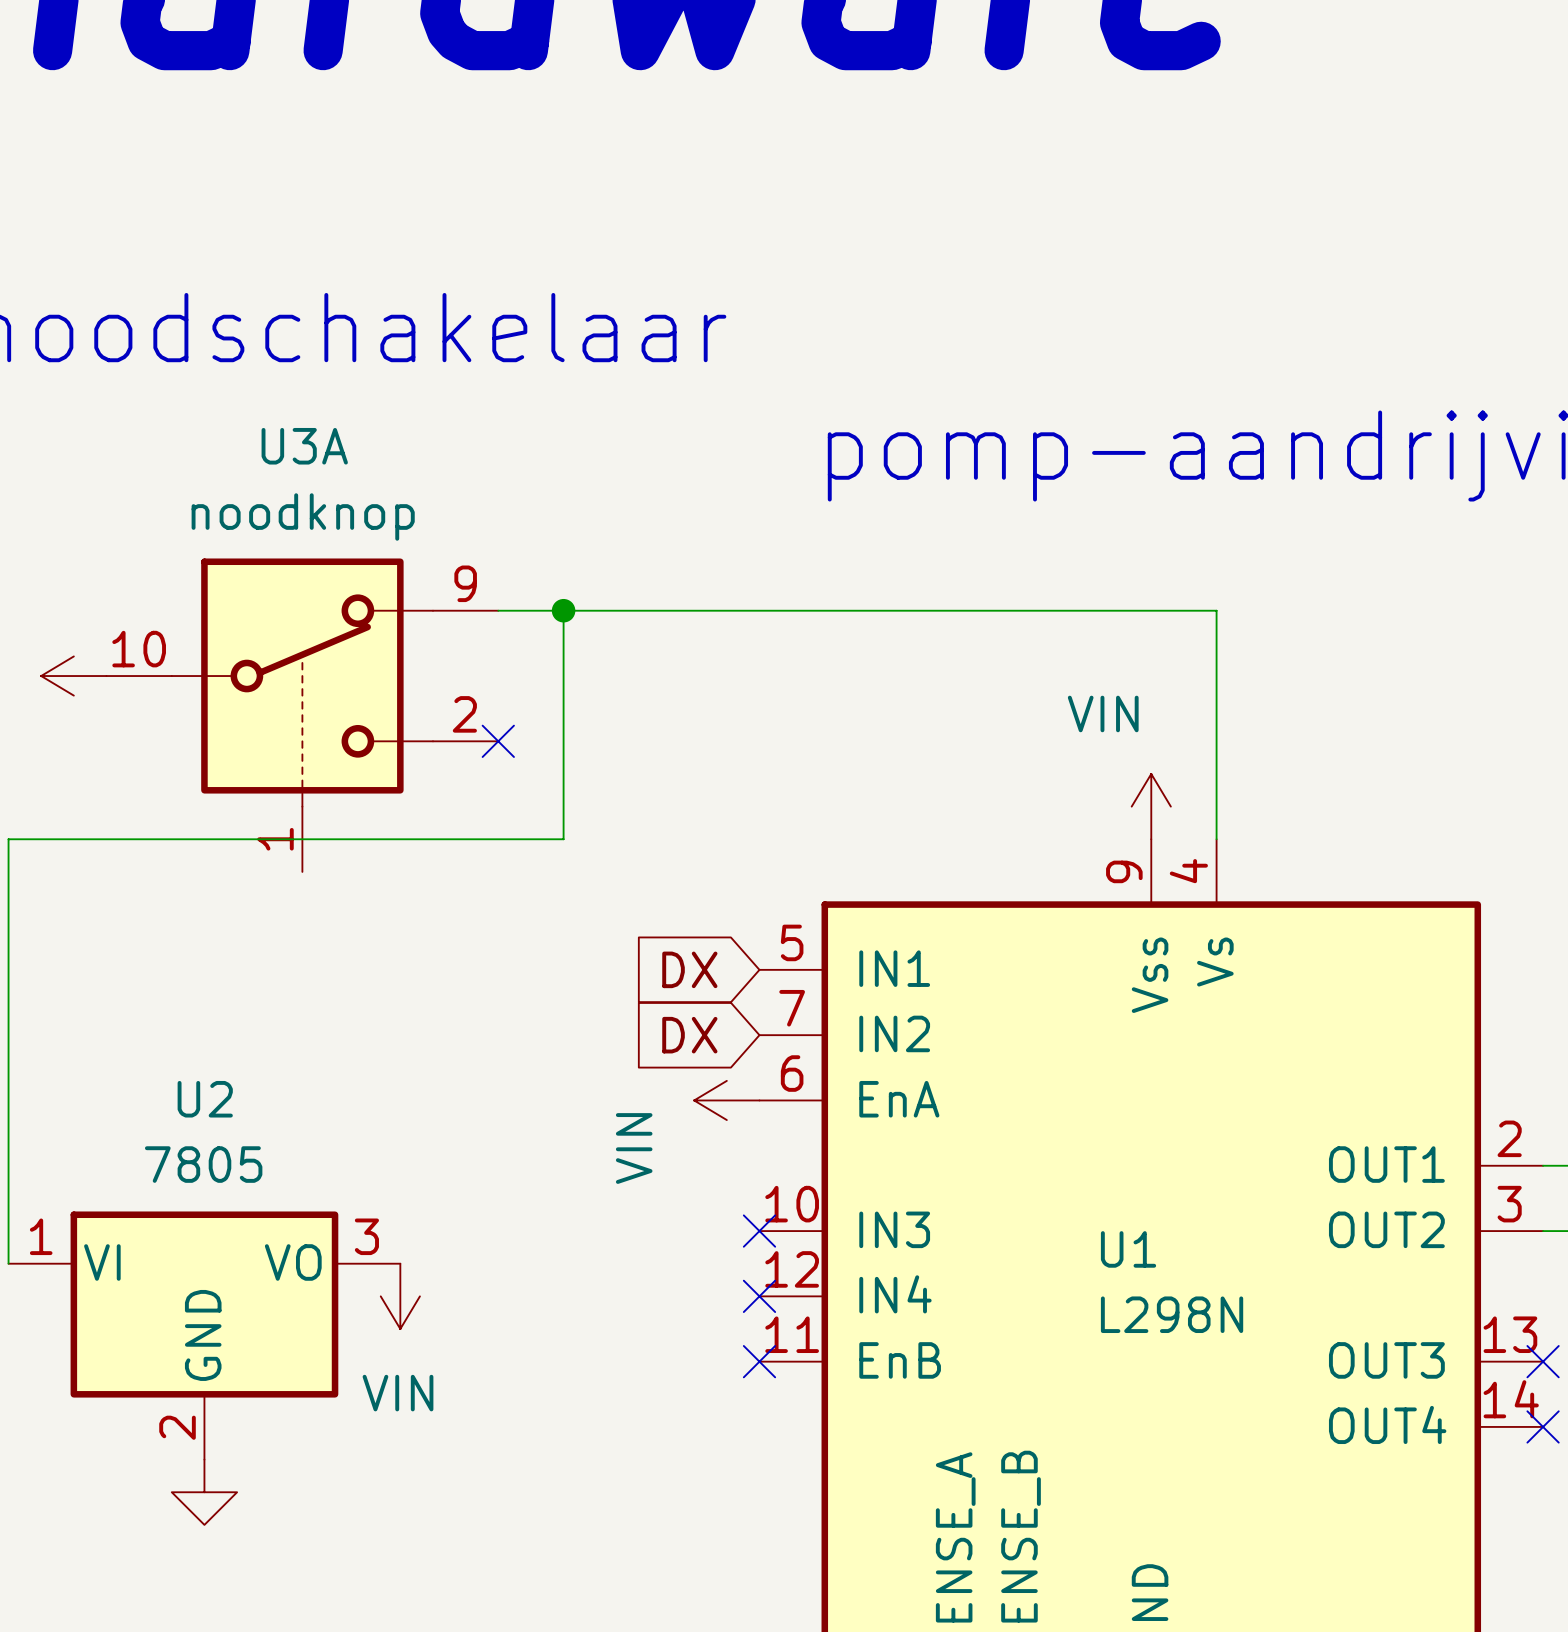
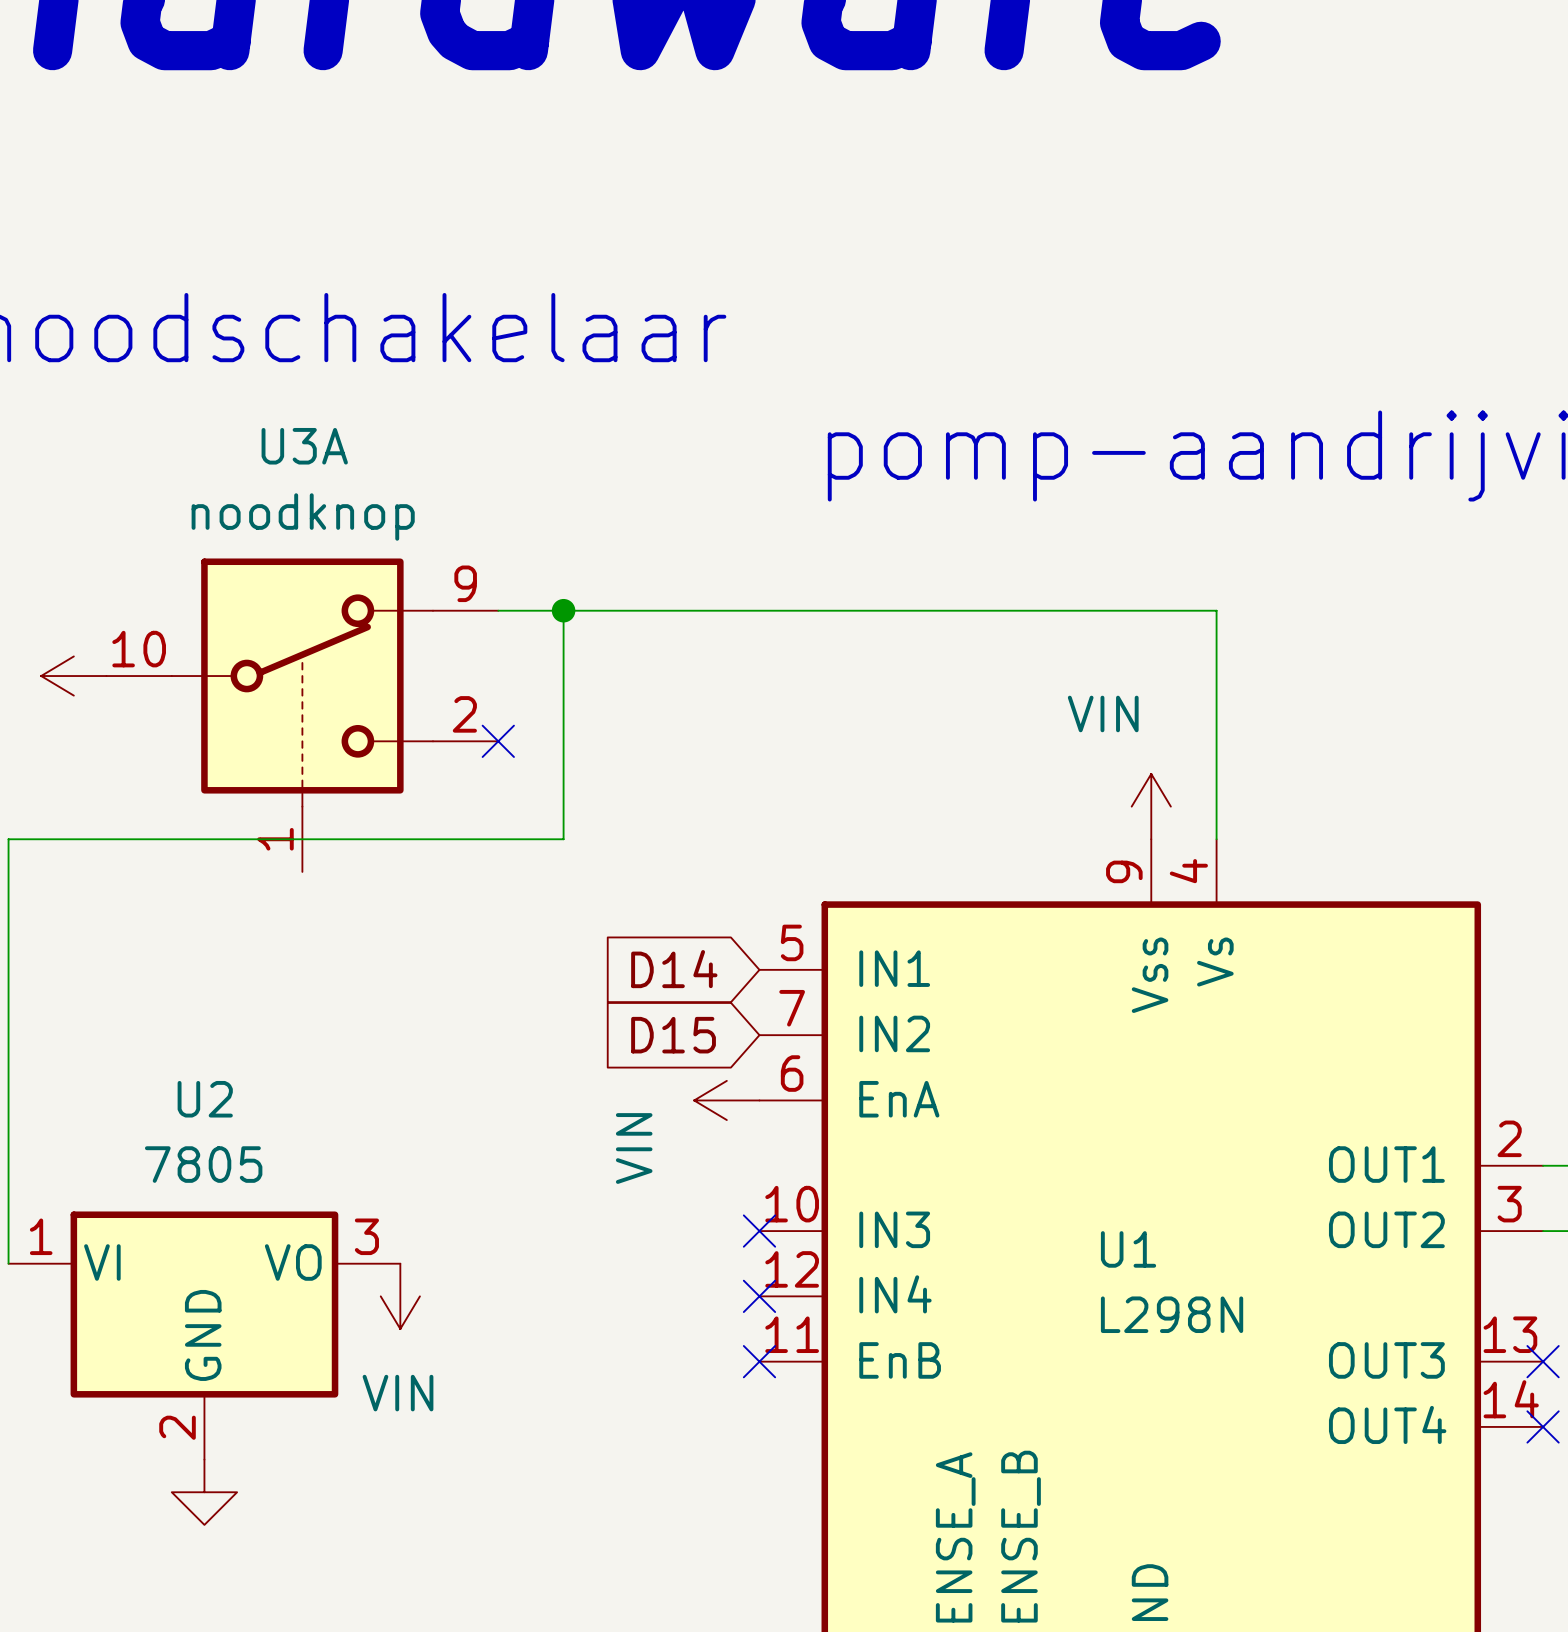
global label: DX (689, 969) -> D14 (674, 969)
global label: DX (689, 1035) -> D15 (673, 1035)

